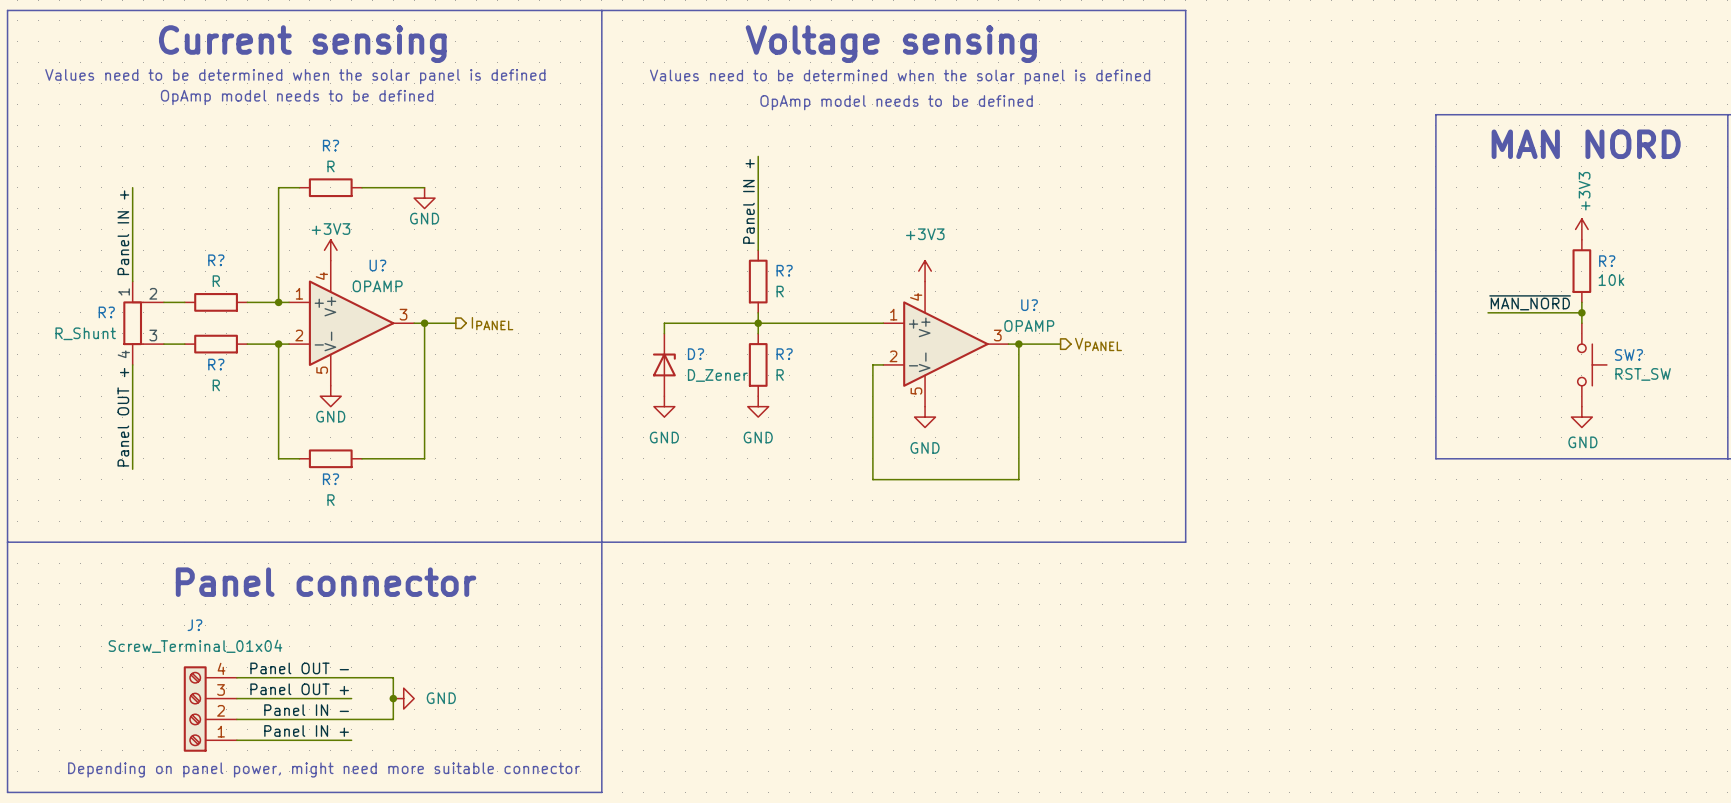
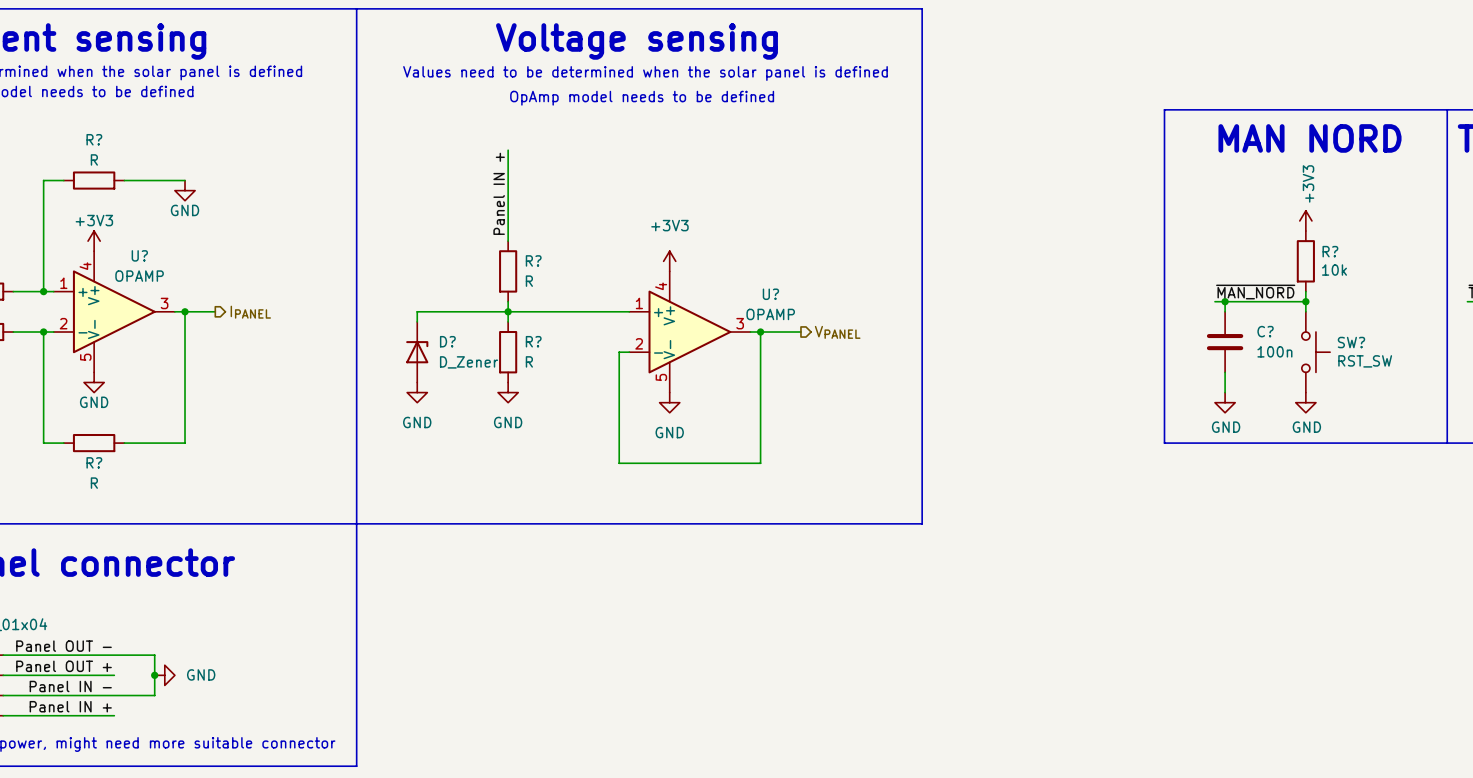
wire: none -> (1225, 301) (1225, 311)
junction: none -> (1225, 301)
C?: none -> 100n (1225, 342)
wire: none -> (1225, 372) (1225, 392)
power symbol: none -> GND (1225, 402)

